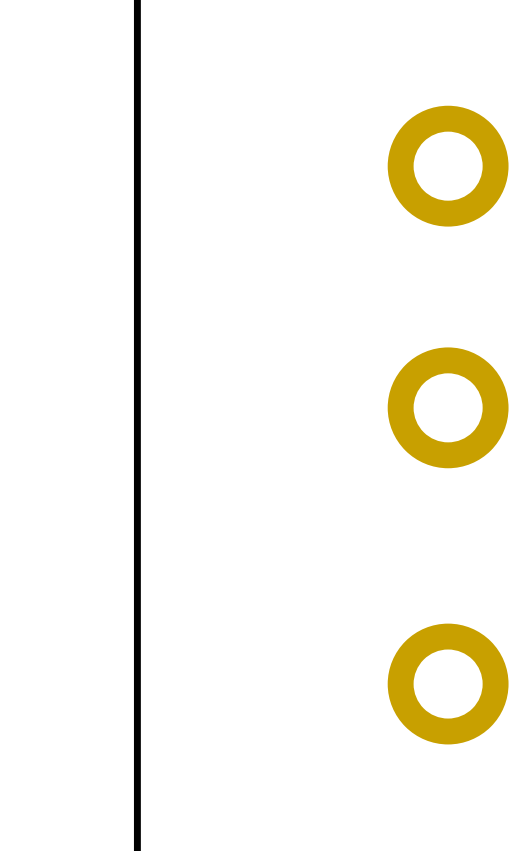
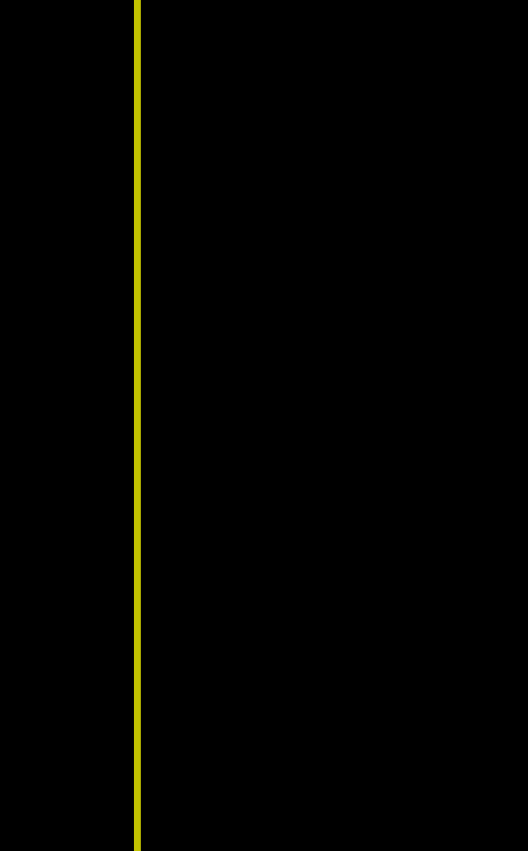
part: (448, 166) -> none
part: (448, 407) -> none
part: (448, 684) -> none

